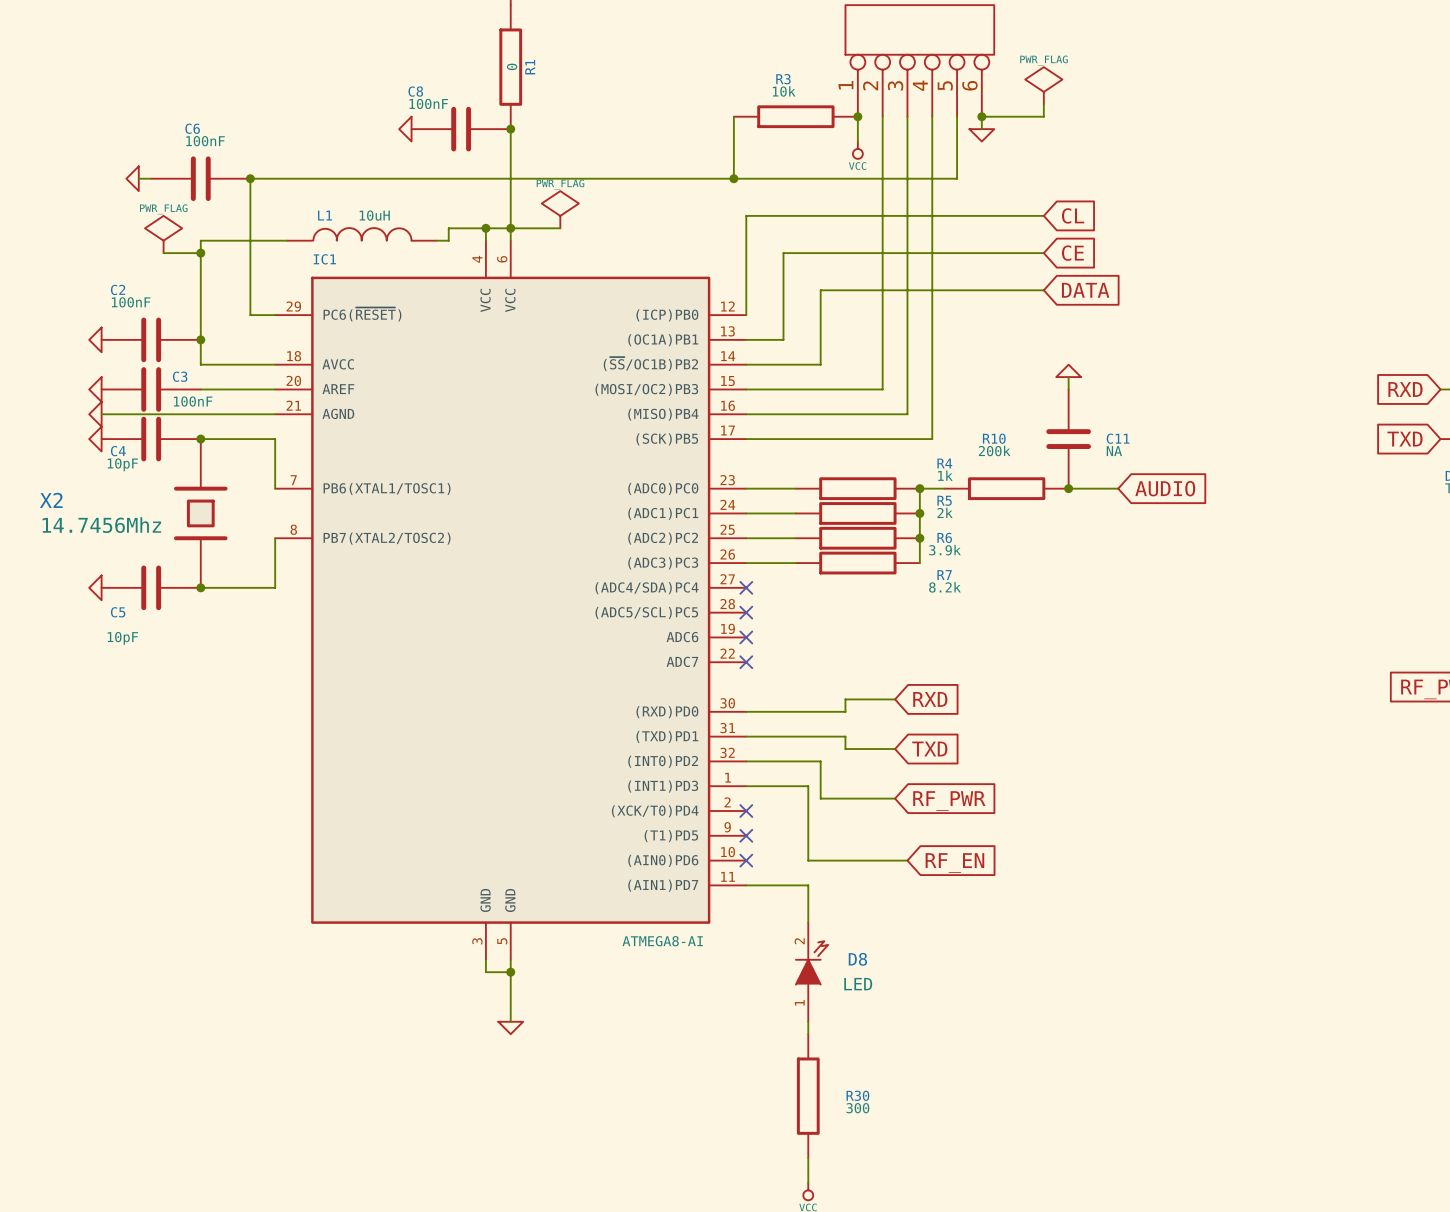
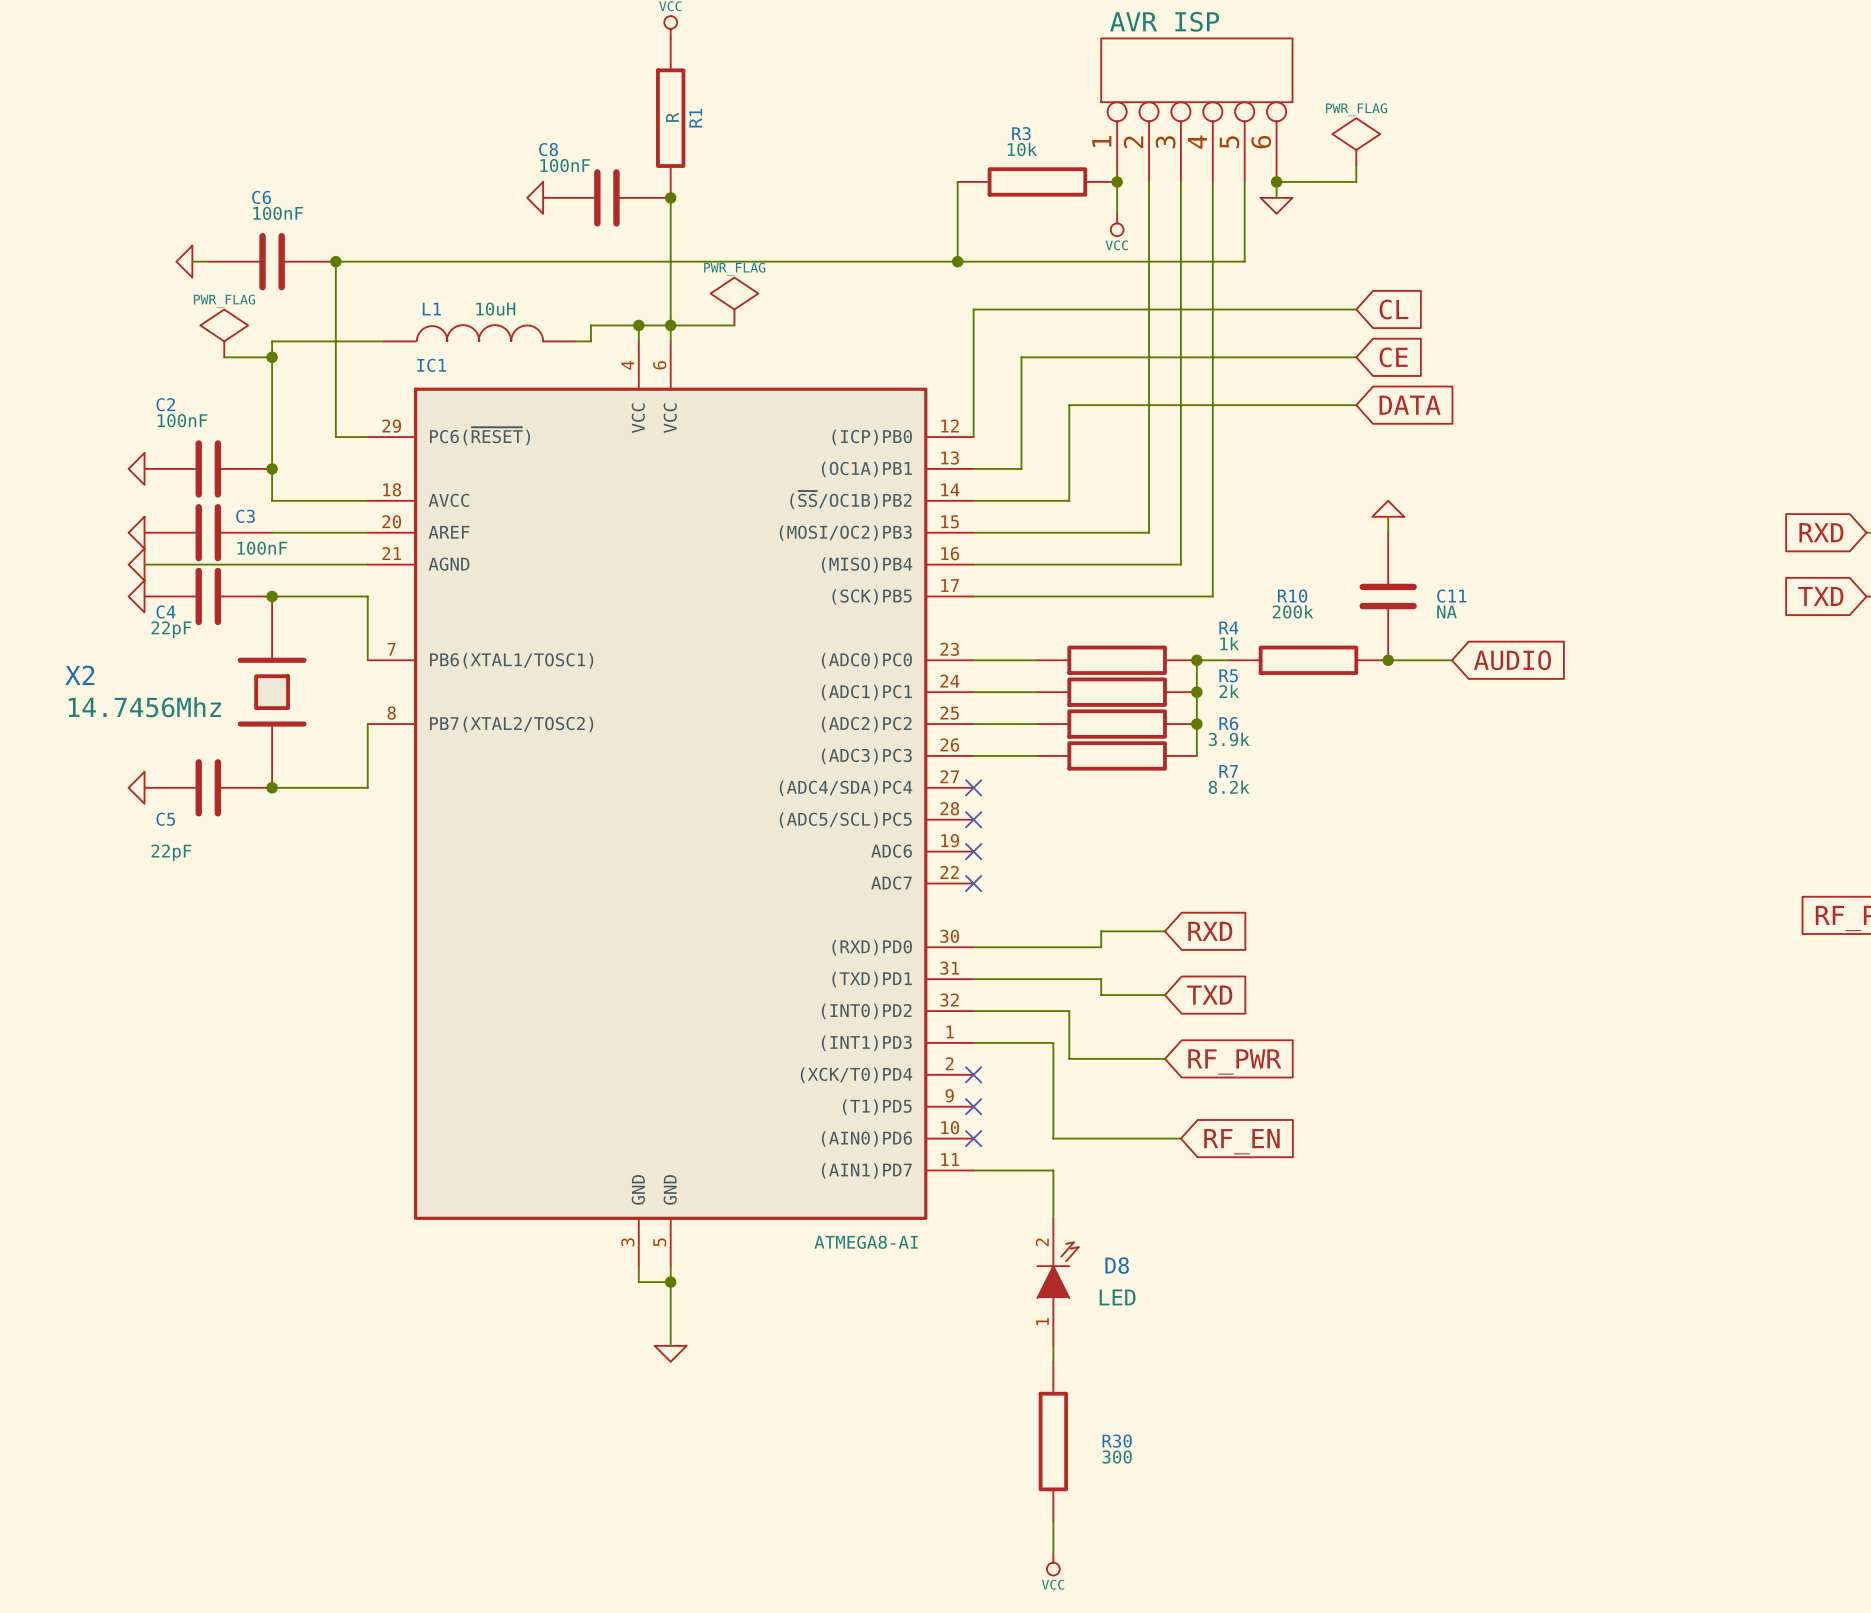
R1 value: 0 (512, 66) -> R (672, 117)
C4 value: 10pF (122, 464) -> 22pF (171, 629)
C5 value: 10pF (122, 638) -> 22pF (171, 852)

